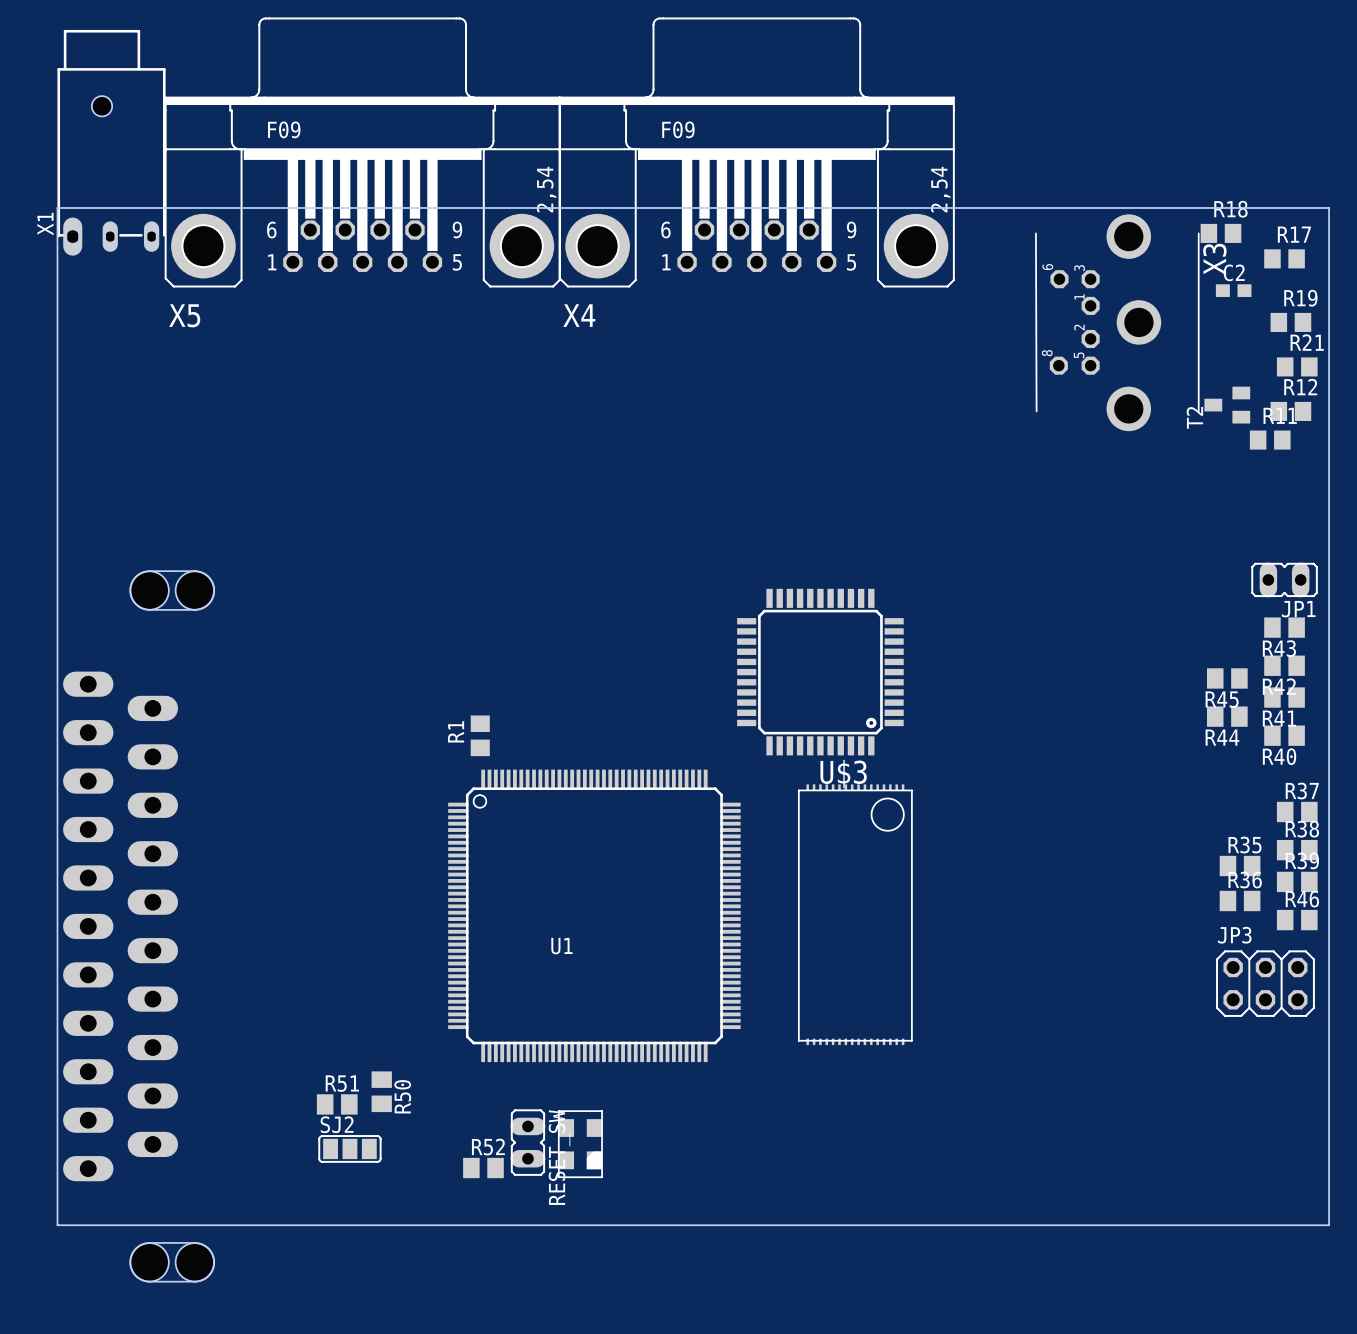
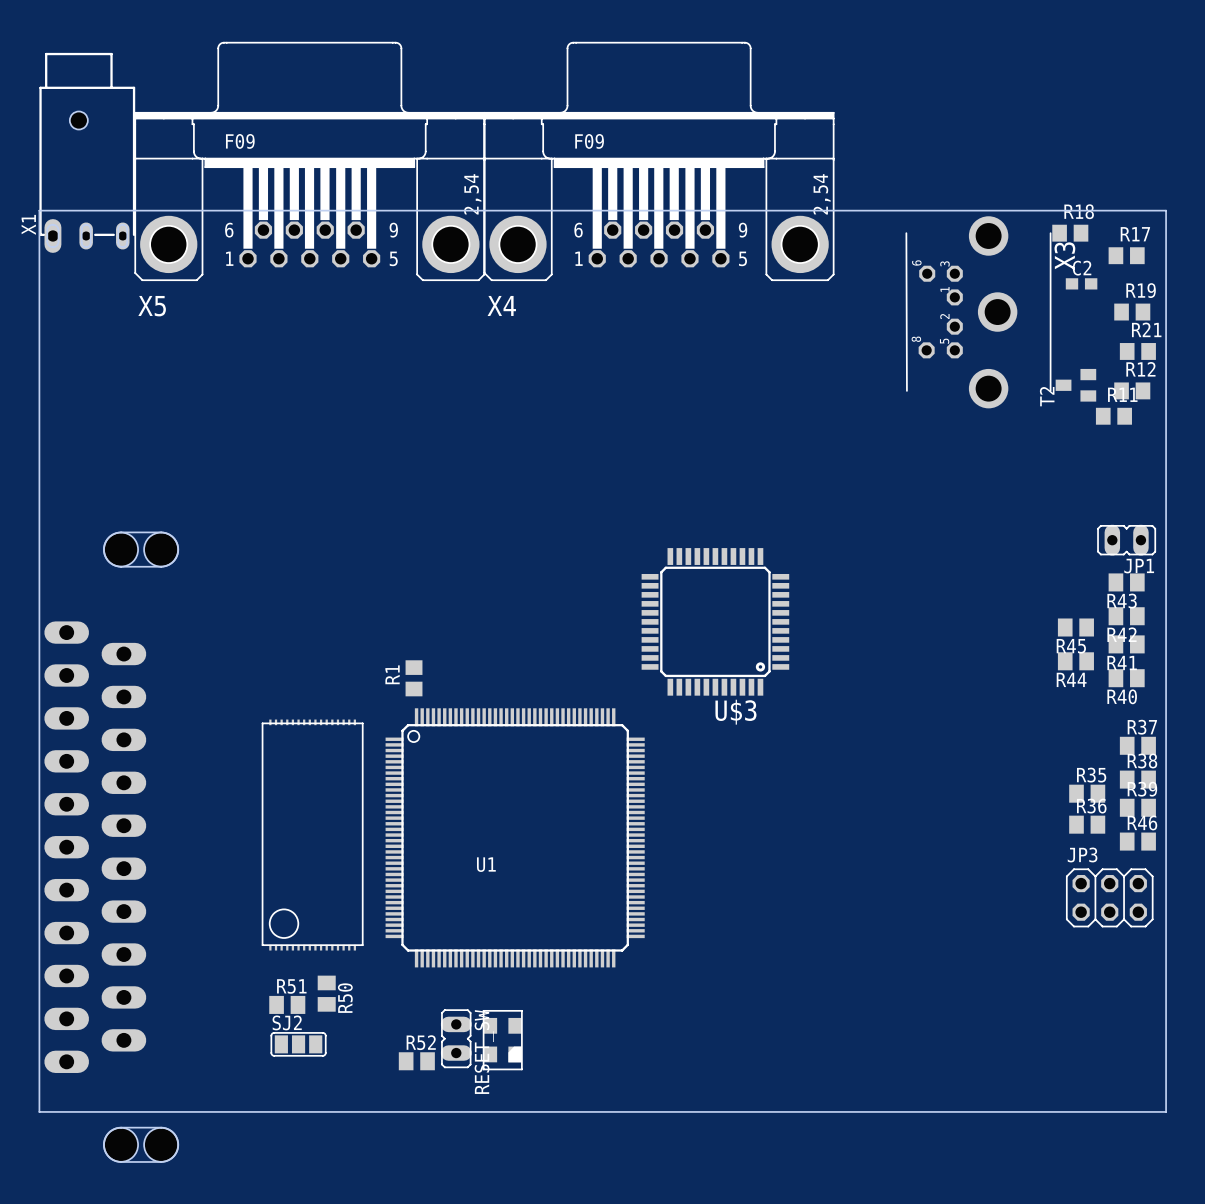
part: none -> (312, 835)
part: (855, 914) -> none

